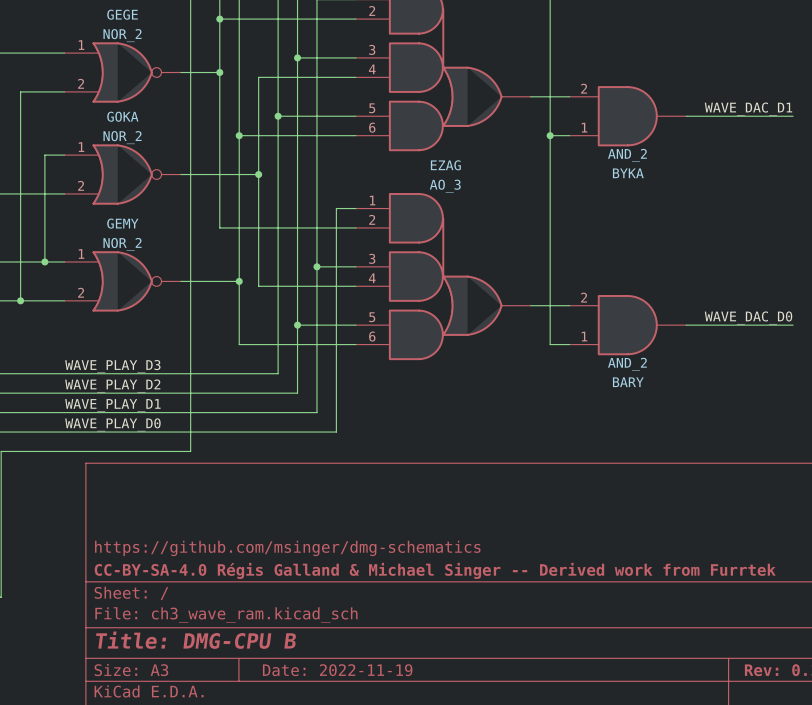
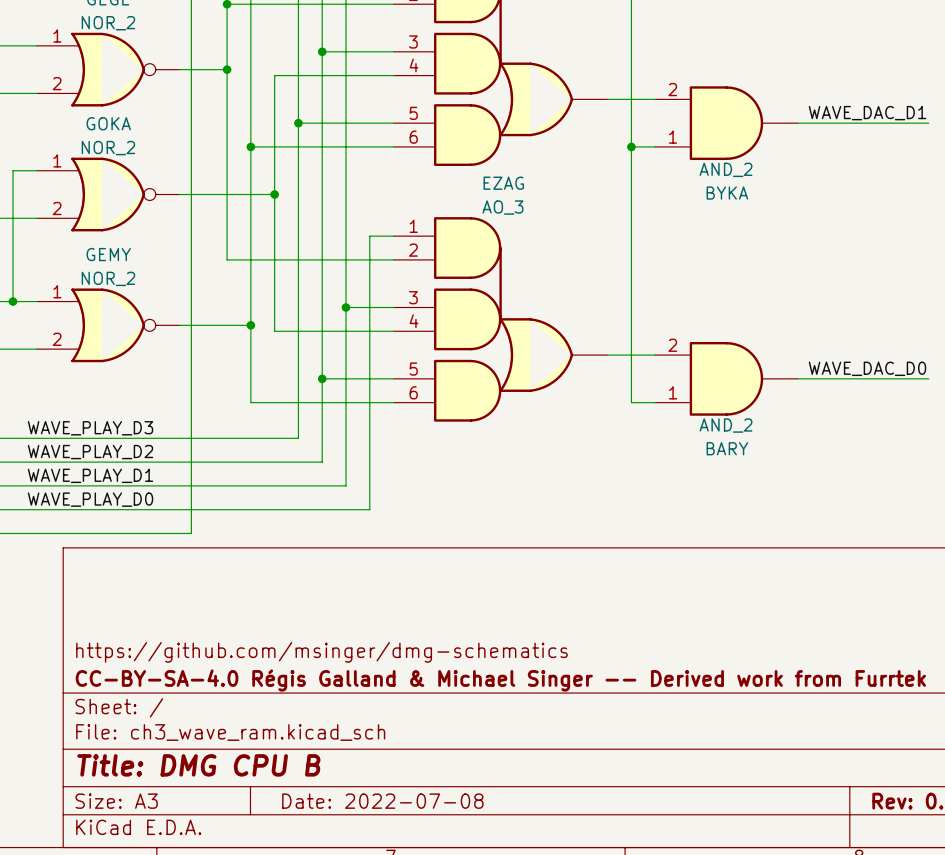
title block: Title: DMG-CPU B (196, 640) -> Title: DMG CPU B (198, 765)
title block: Date: 2022-11-19 (337, 670) -> Date: 2022-07-08 (382, 801)

